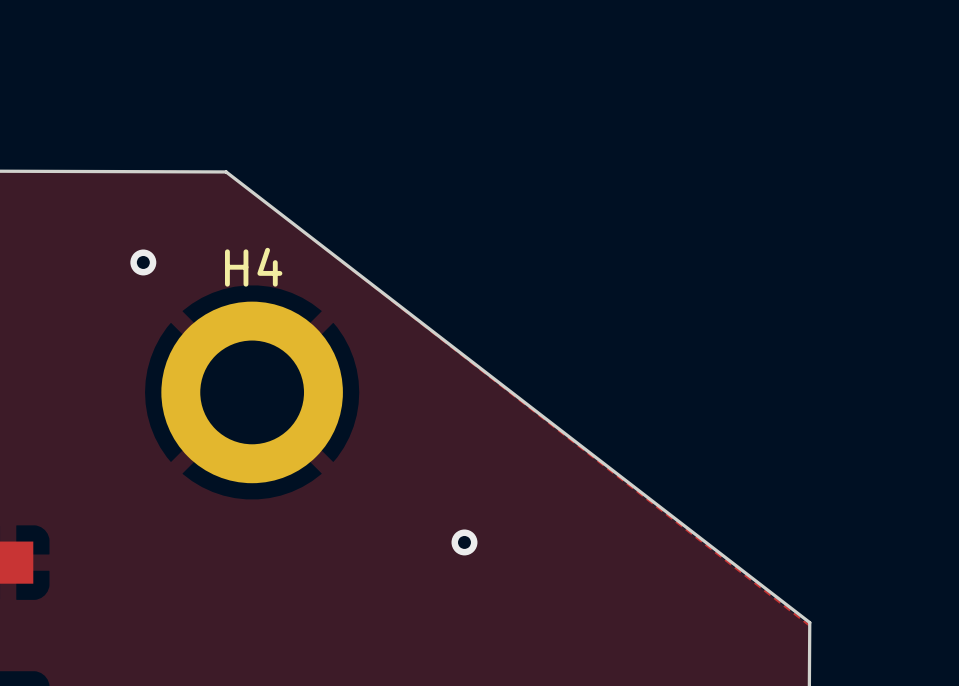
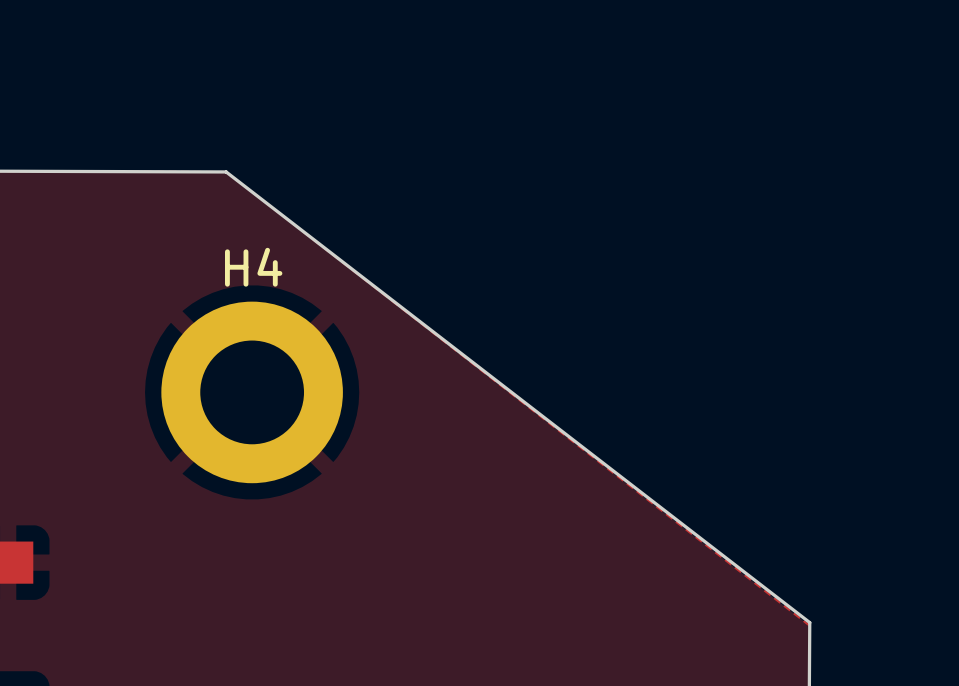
via: (143, 262) -> none
via: (464, 542) -> none

